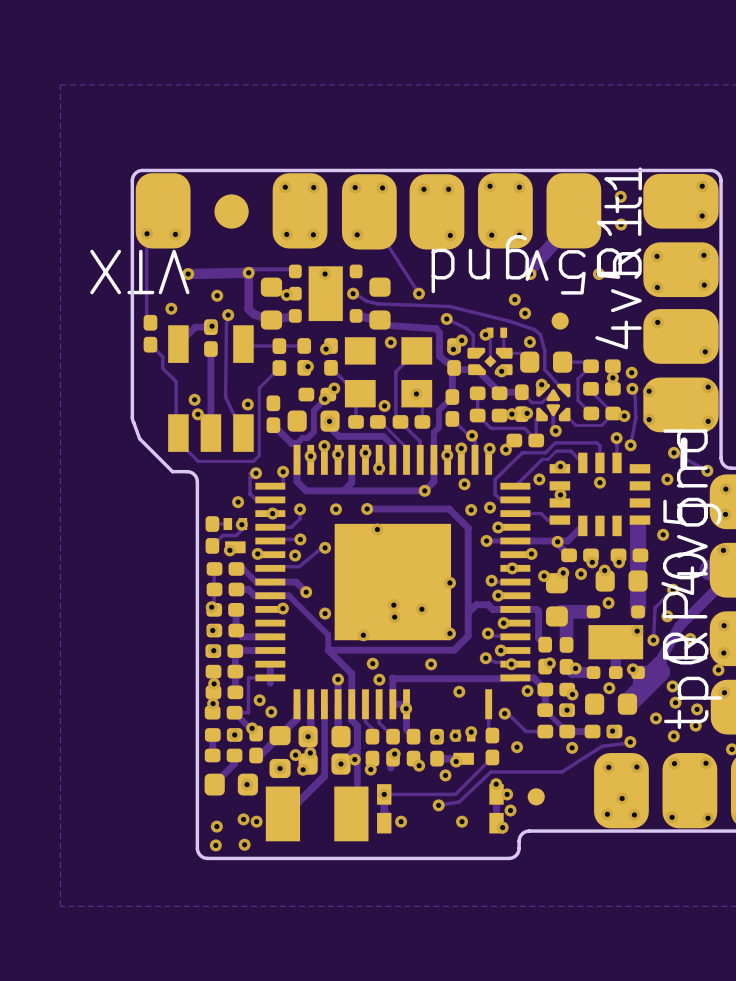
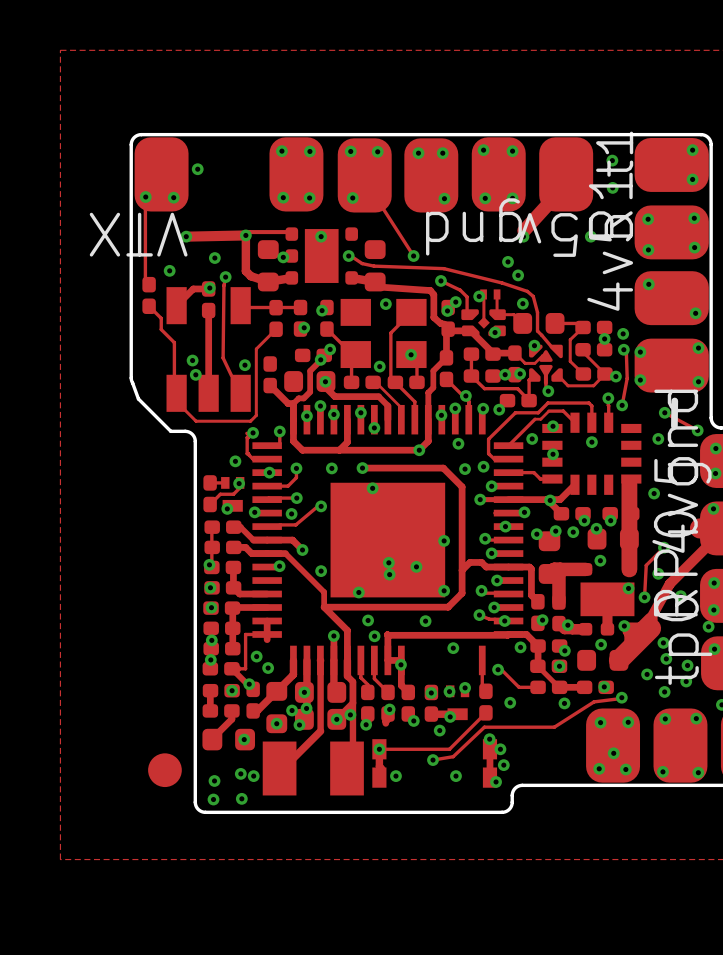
via: none -> (197, 169)
part position: (231, 211) -> (164, 770)
part: (560, 321) -> none
part: (536, 796) -> none

